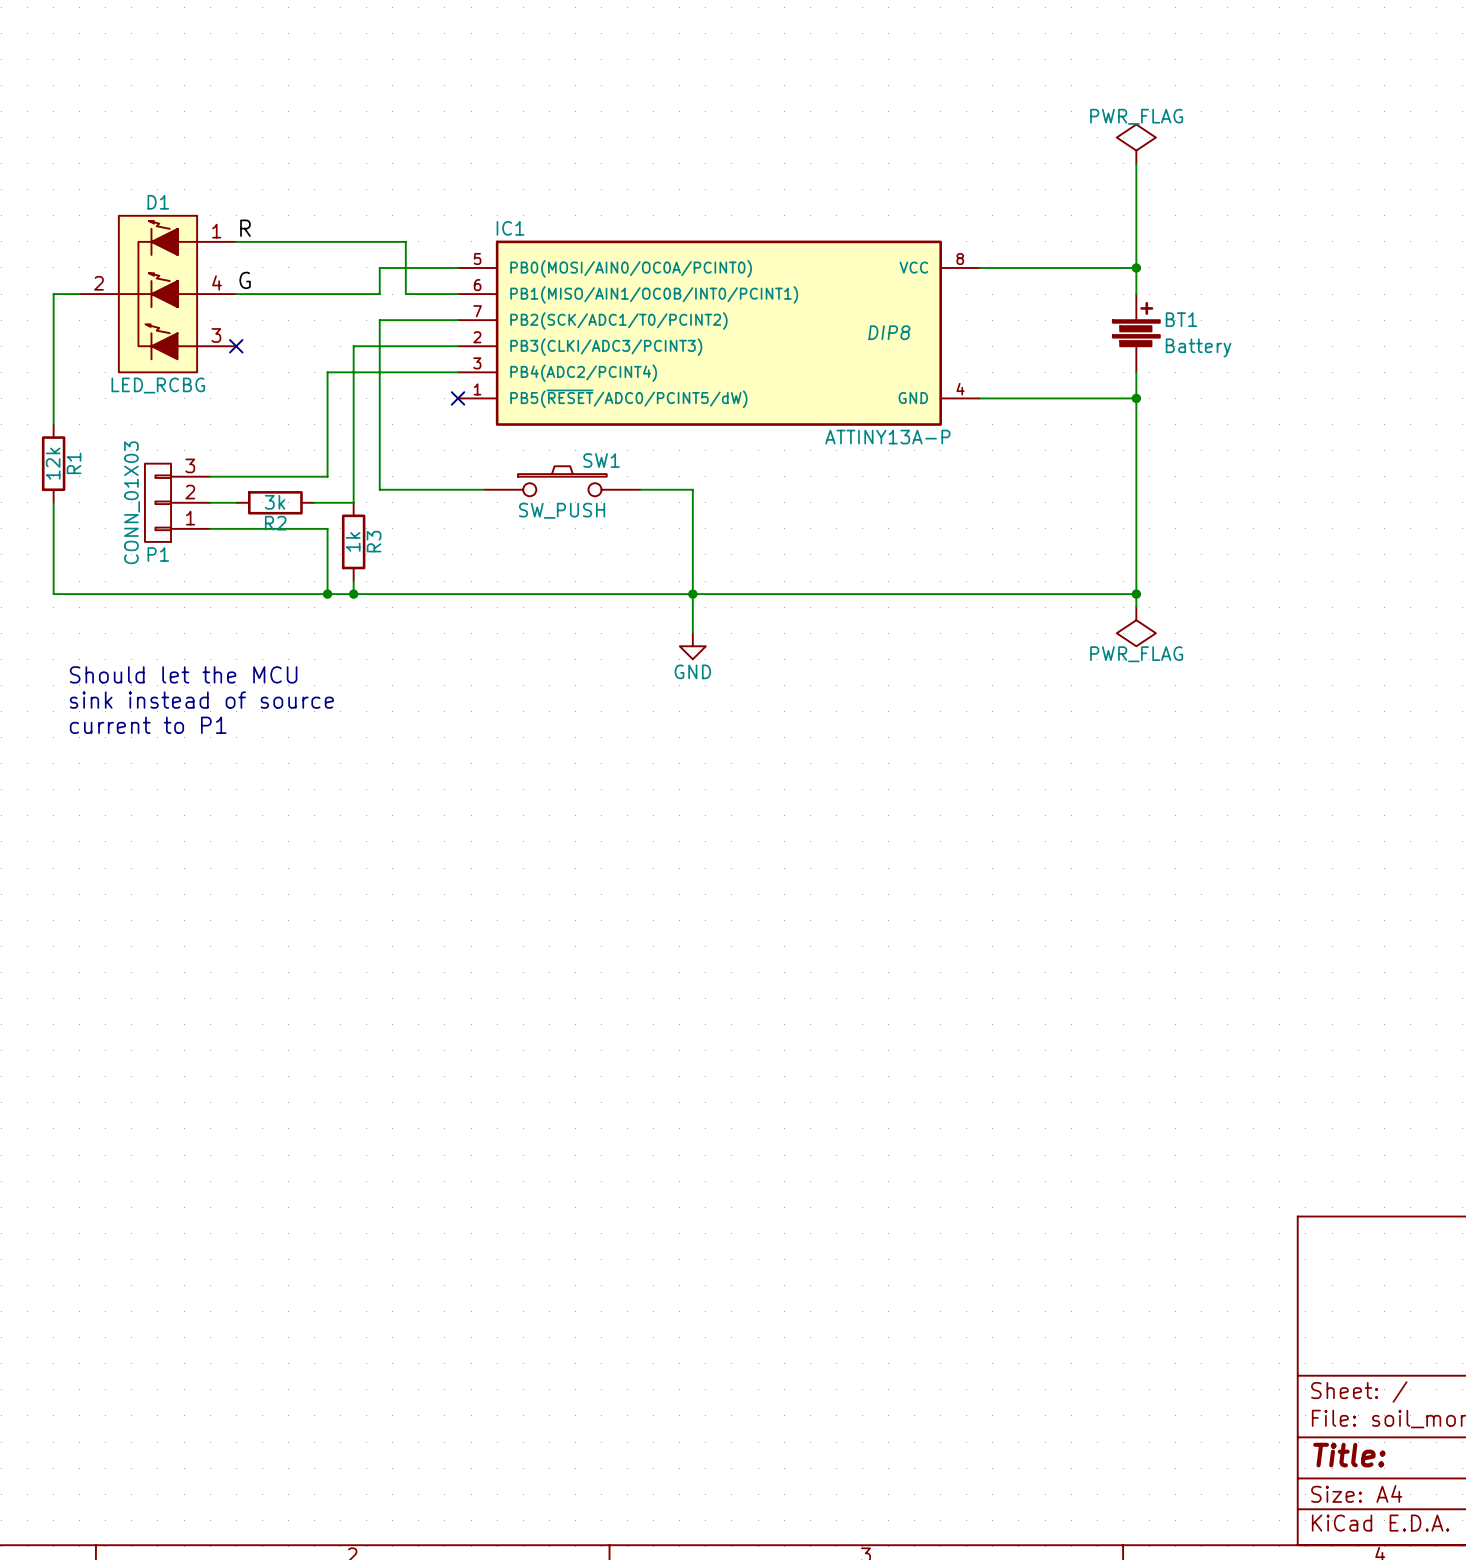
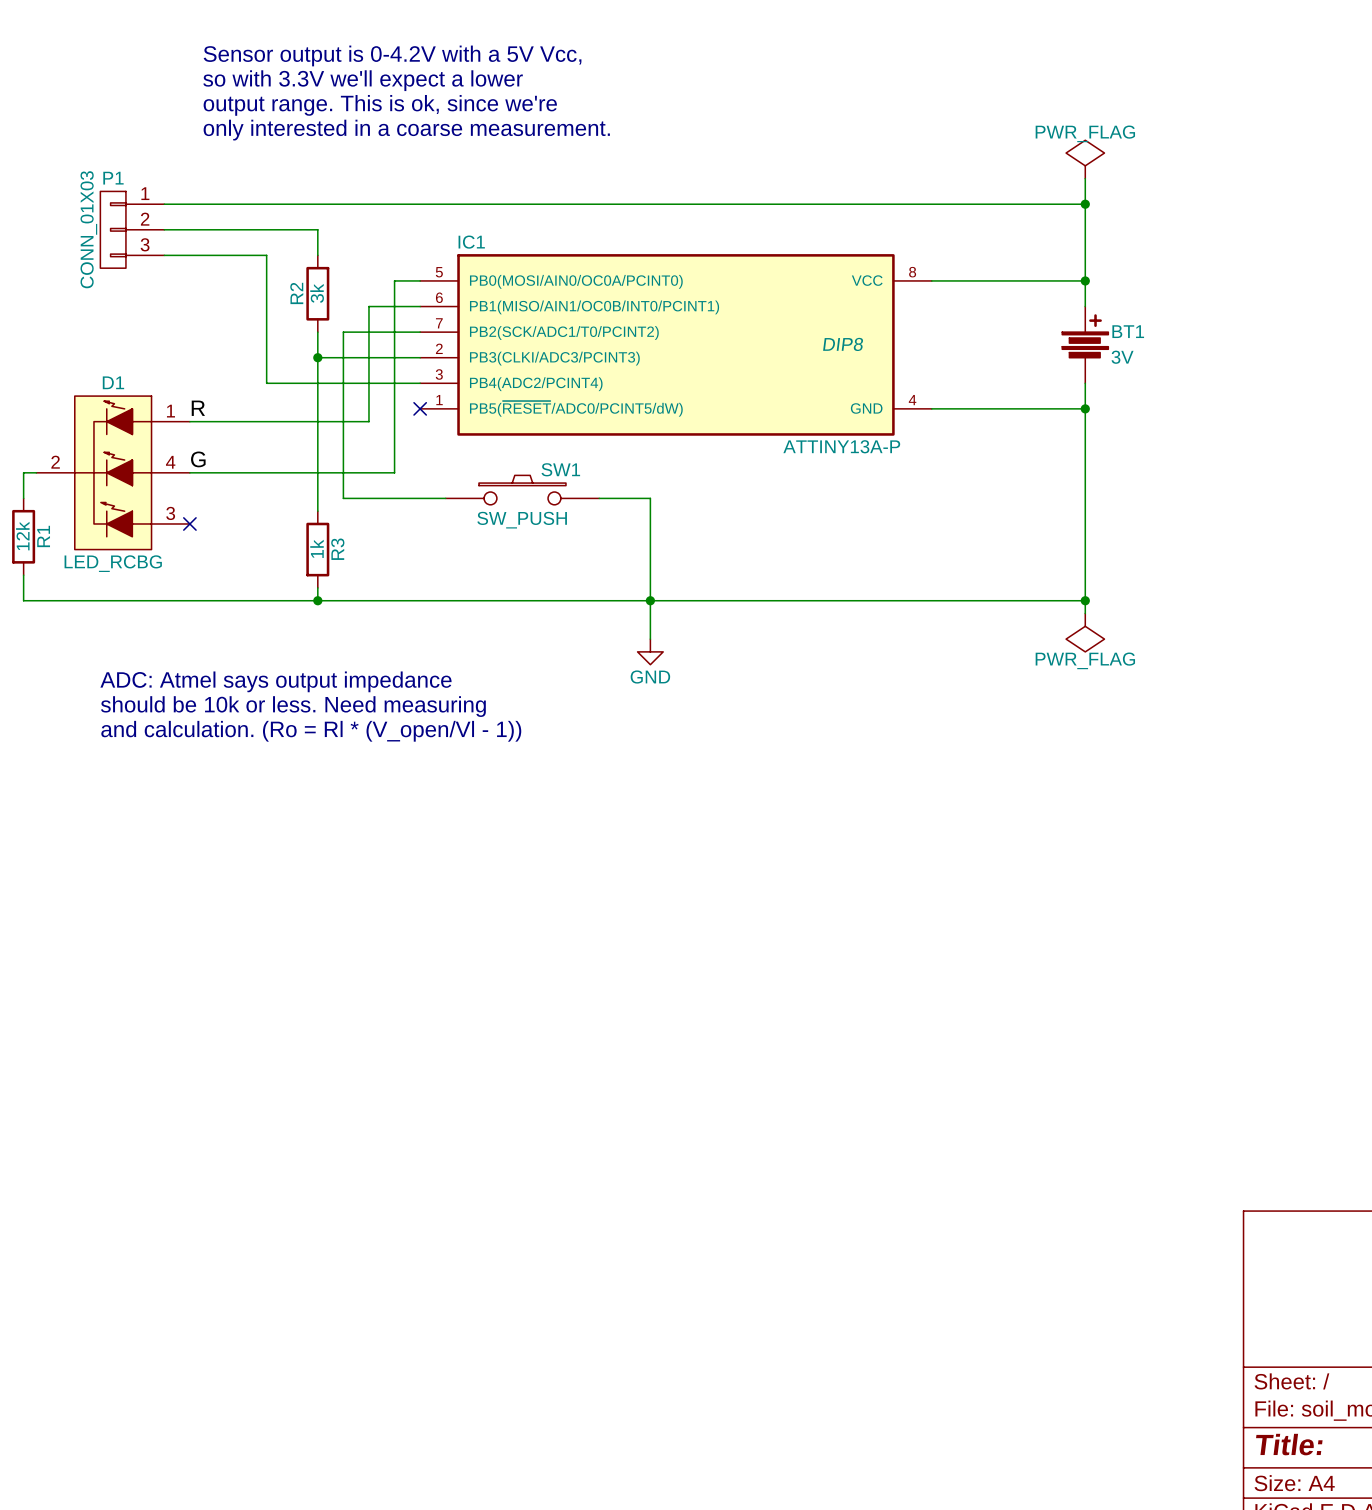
text: none -> Sensor output is 0-4.2V with a 5V Vcc, (392, 55)
text: none -> so with 3.3V we'll expect a lower (363, 80)
text: none -> output range. This is ok, since we're (380, 105)
text: none -> only interested in a coarse measurement. (406, 130)
wire: none -> (164, 204) (1085, 204)
junction: none -> (1085, 204)
wire: none -> (164, 229) (317, 229) (317, 255)
label position: R (245, 228) -> R (198, 408)
wire: (301, 241) (405, 241) (405, 294) -> (266, 255) (266, 383) (292, 383)
wire: (431, 267) (379, 267) (379, 294) (236, 294) -> (394, 280) (394, 472) (189, 472)
label position: G (245, 280) -> G (198, 459)
wire: (79, 294) (53, 294) (53, 424) -> none
D1 position: (157, 294) -> (113, 472)
wire: none -> (368, 306) (368, 421) (189, 421)
wire: none -> (317, 332) (317, 357)
no-connect mark: (236, 346) -> none
junction: none -> (317, 357)
BT1 value: Battery (1198, 347) -> 3V (1122, 357)
wire: (327, 372) (327, 476) (210, 476) -> none
R1 position: (53, 463) -> (23, 536)
wire: none -> (36, 472) (23, 472) (23, 498)
wire: (53, 502) (53, 568) -> none
P1 flip: as is (157, 502) -> up-down (113, 229)
P1 position: (177, 502) -> (132, 229)
wire: (210, 502) (236, 502) -> none
R2 rotation: 0° (275, 502) -> 90° clockwise (317, 293)
R2 position: (275, 502) -> (317, 293)
wire: (314, 502) (353, 502) -> none
no-connect mark: none -> (189, 523)
wire: (210, 528) (327, 528) (327, 594) -> none
junction: (327, 594) -> none
text: Should let the MCU (183, 674) -> none
text: none -> ADC: Atmel says output impedance (275, 681)
text: sink instead of source (201, 700) -> none
text: none -> should be 10k or less. Need measuring (293, 706)
text: current to P1 (148, 725) -> none
text: none -> and calculation. (Ro = Rl * (V_open/Vl - 1)) (311, 731)

